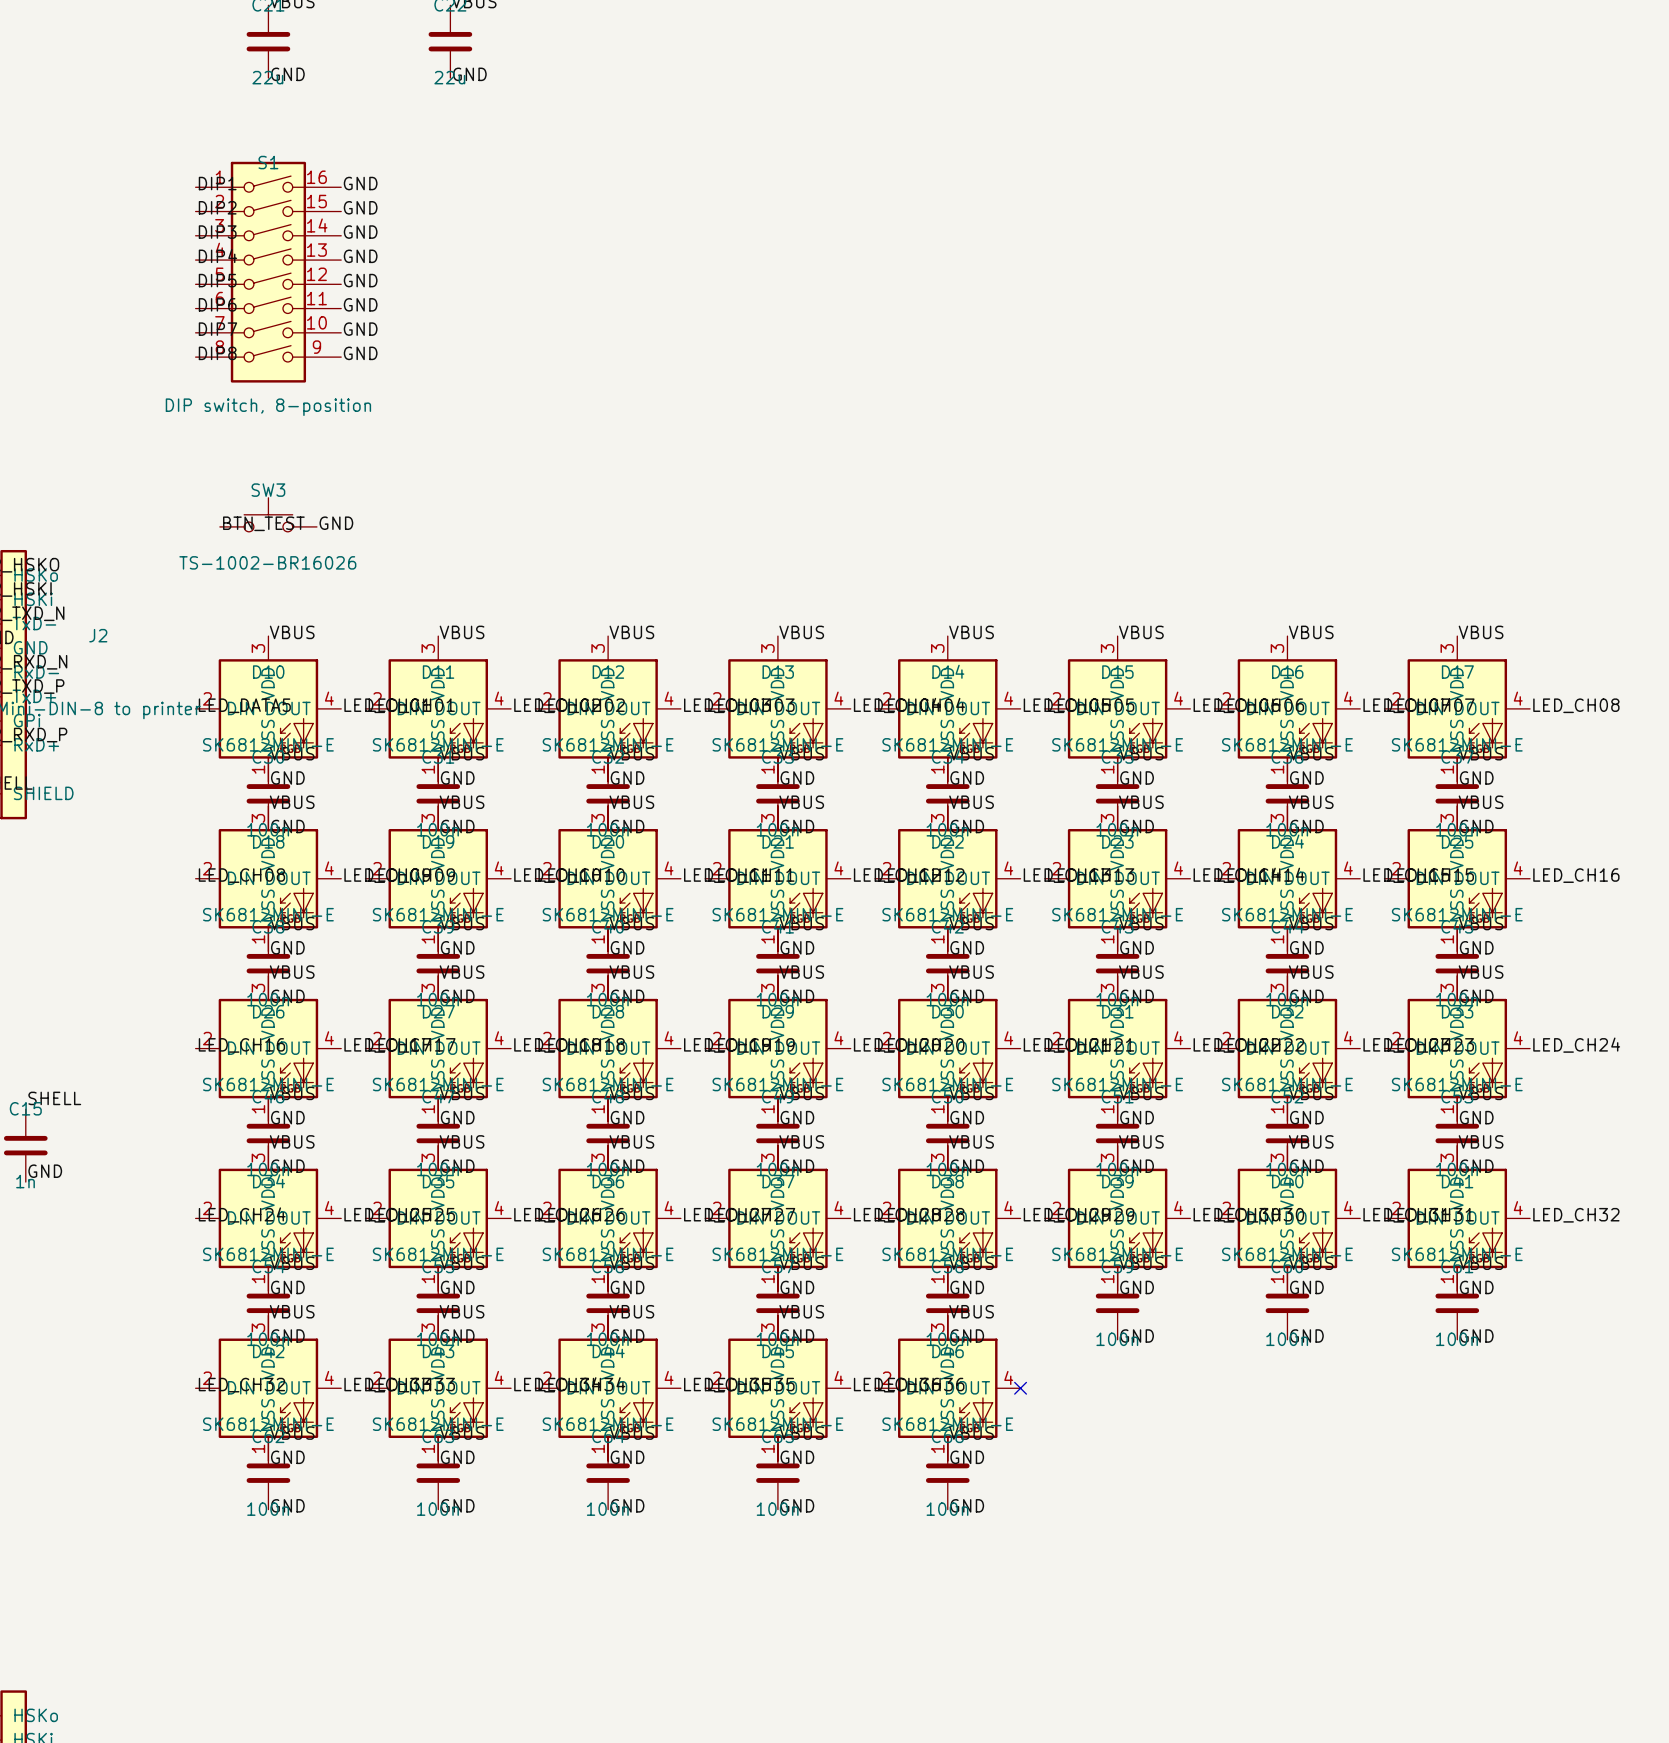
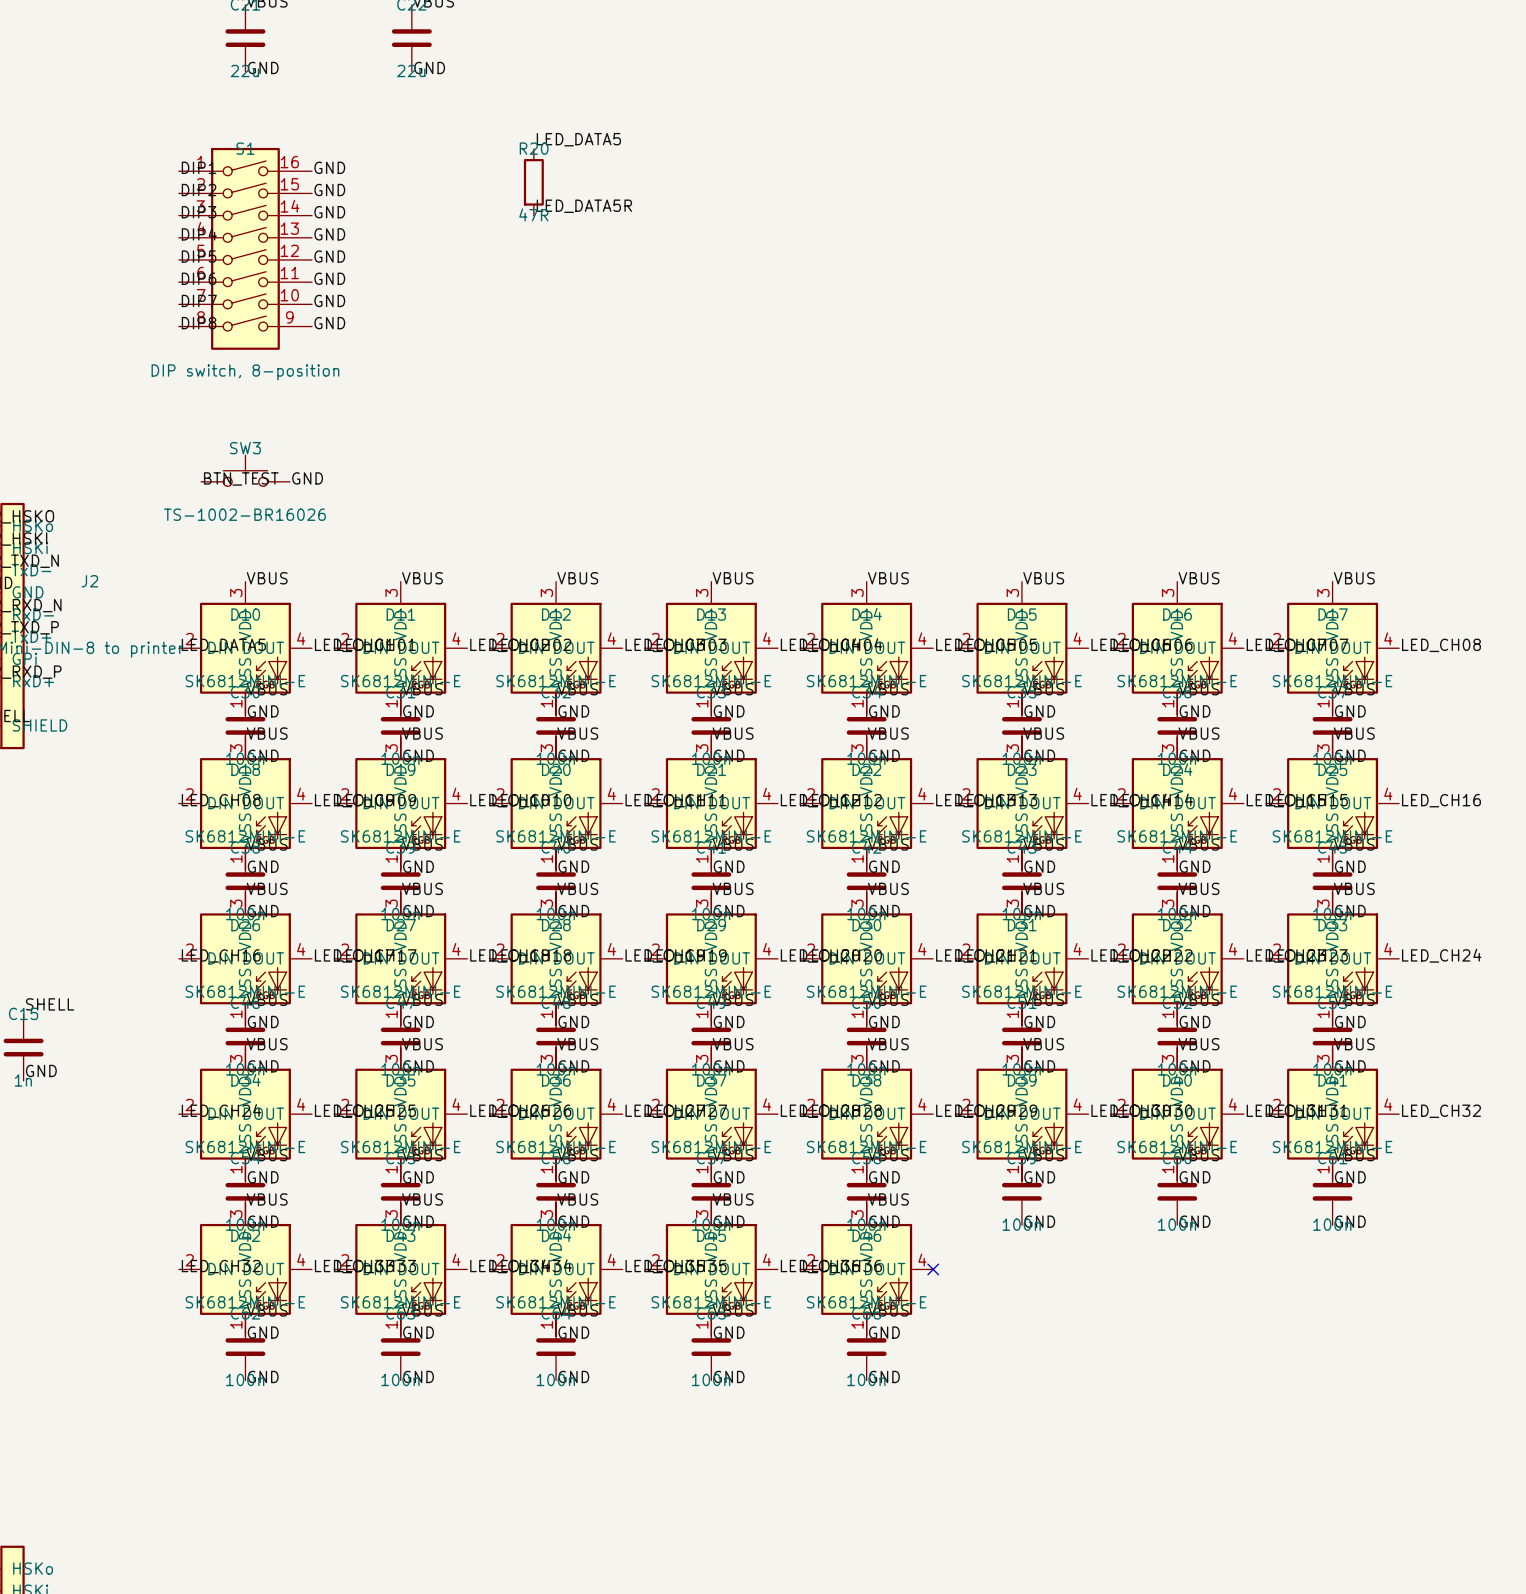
label: none -> LED_DATA5 (578, 139)
R20: none -> 47R (533, 182)
label: none -> LED_DATA5R (584, 206)

